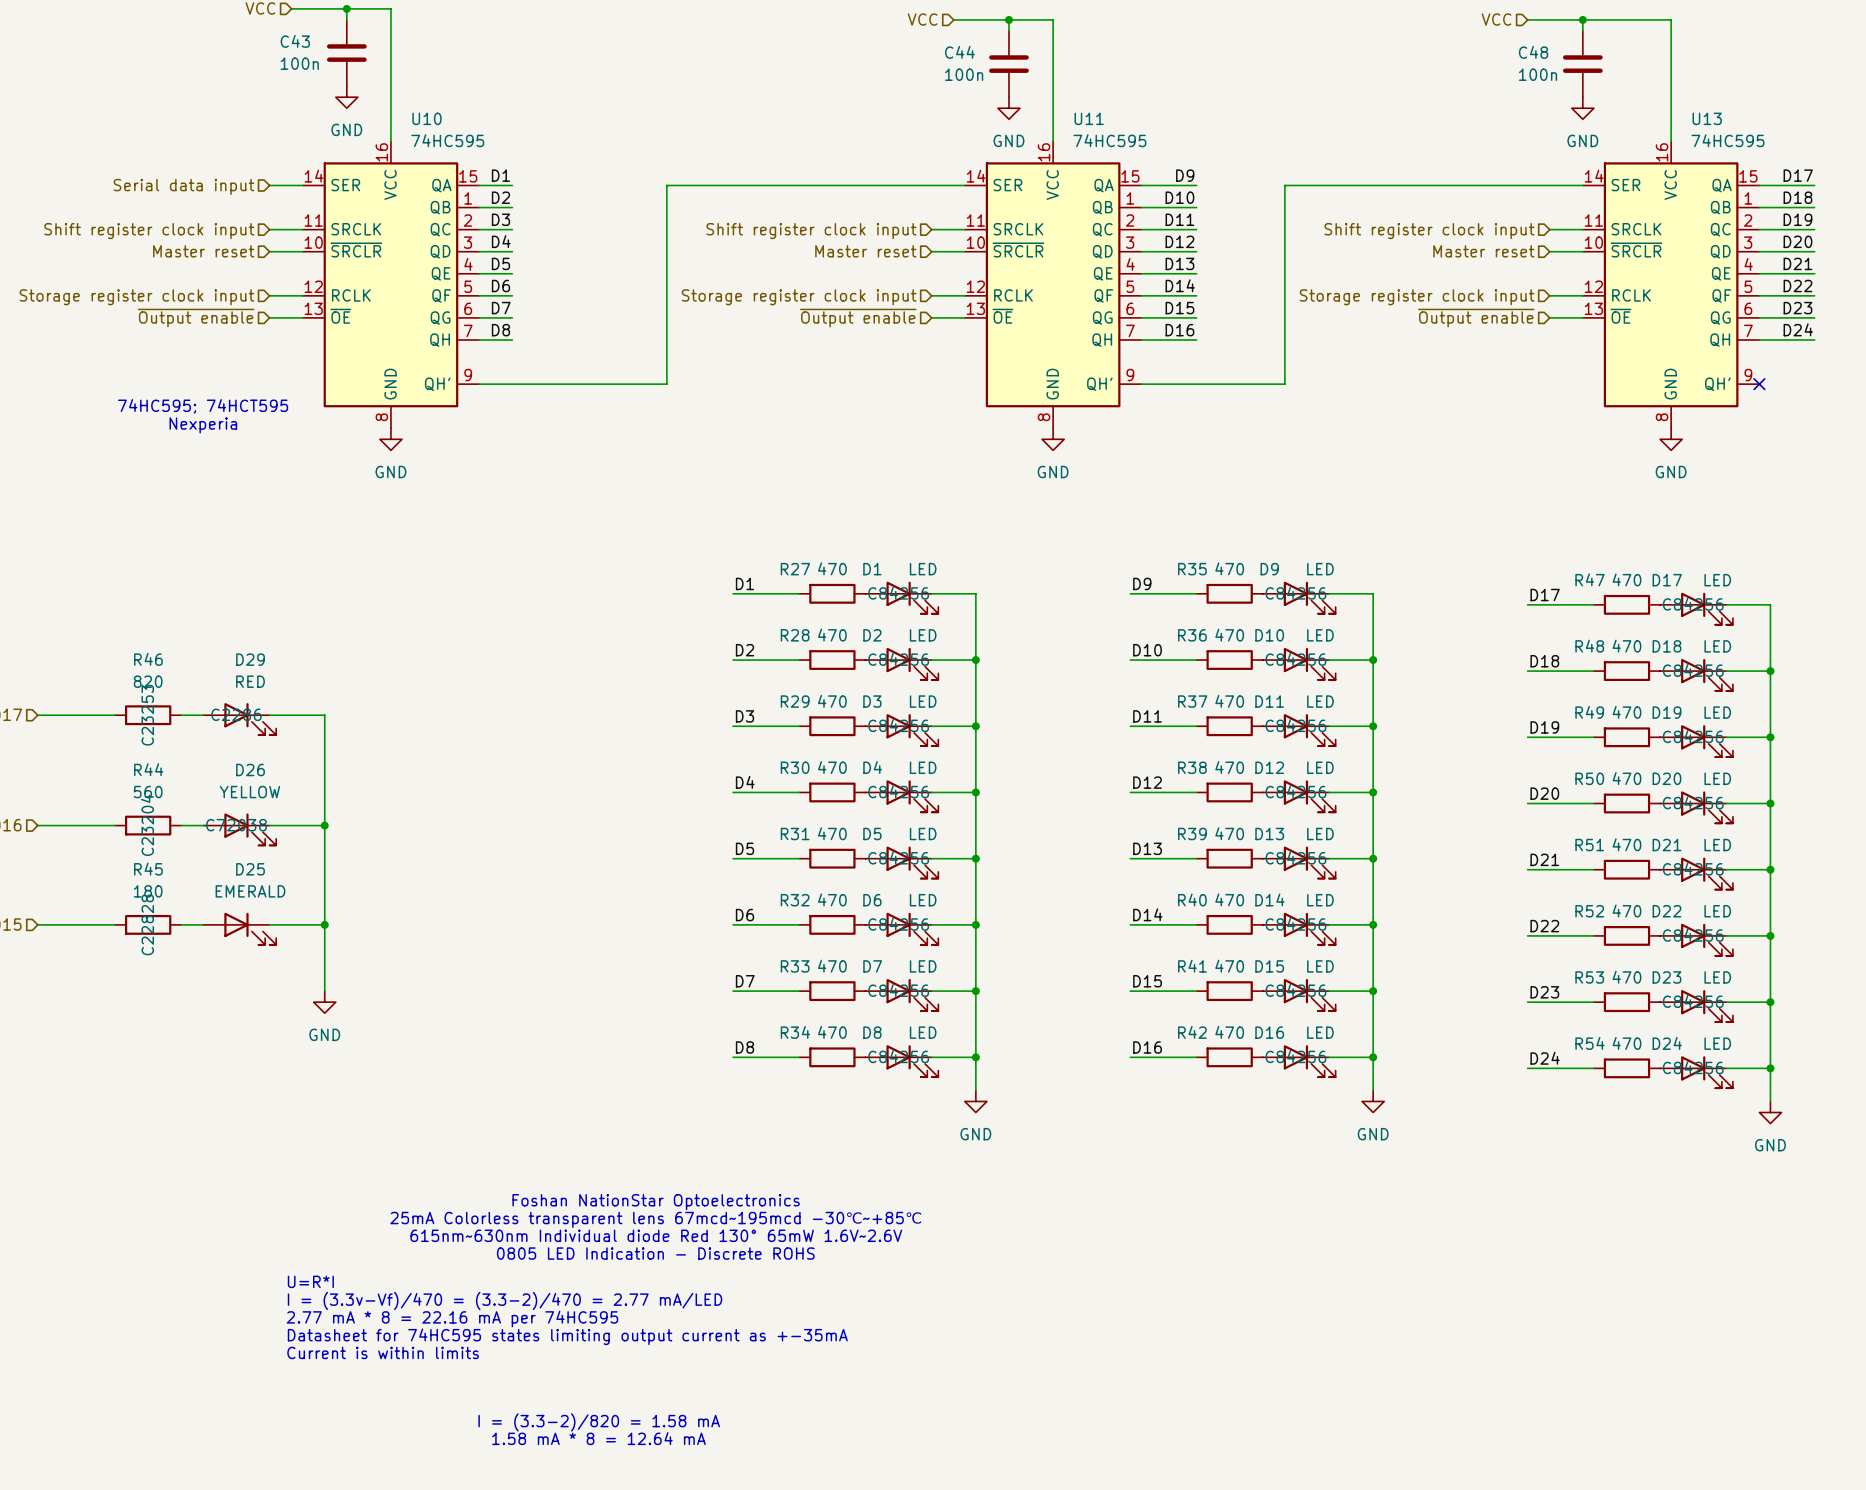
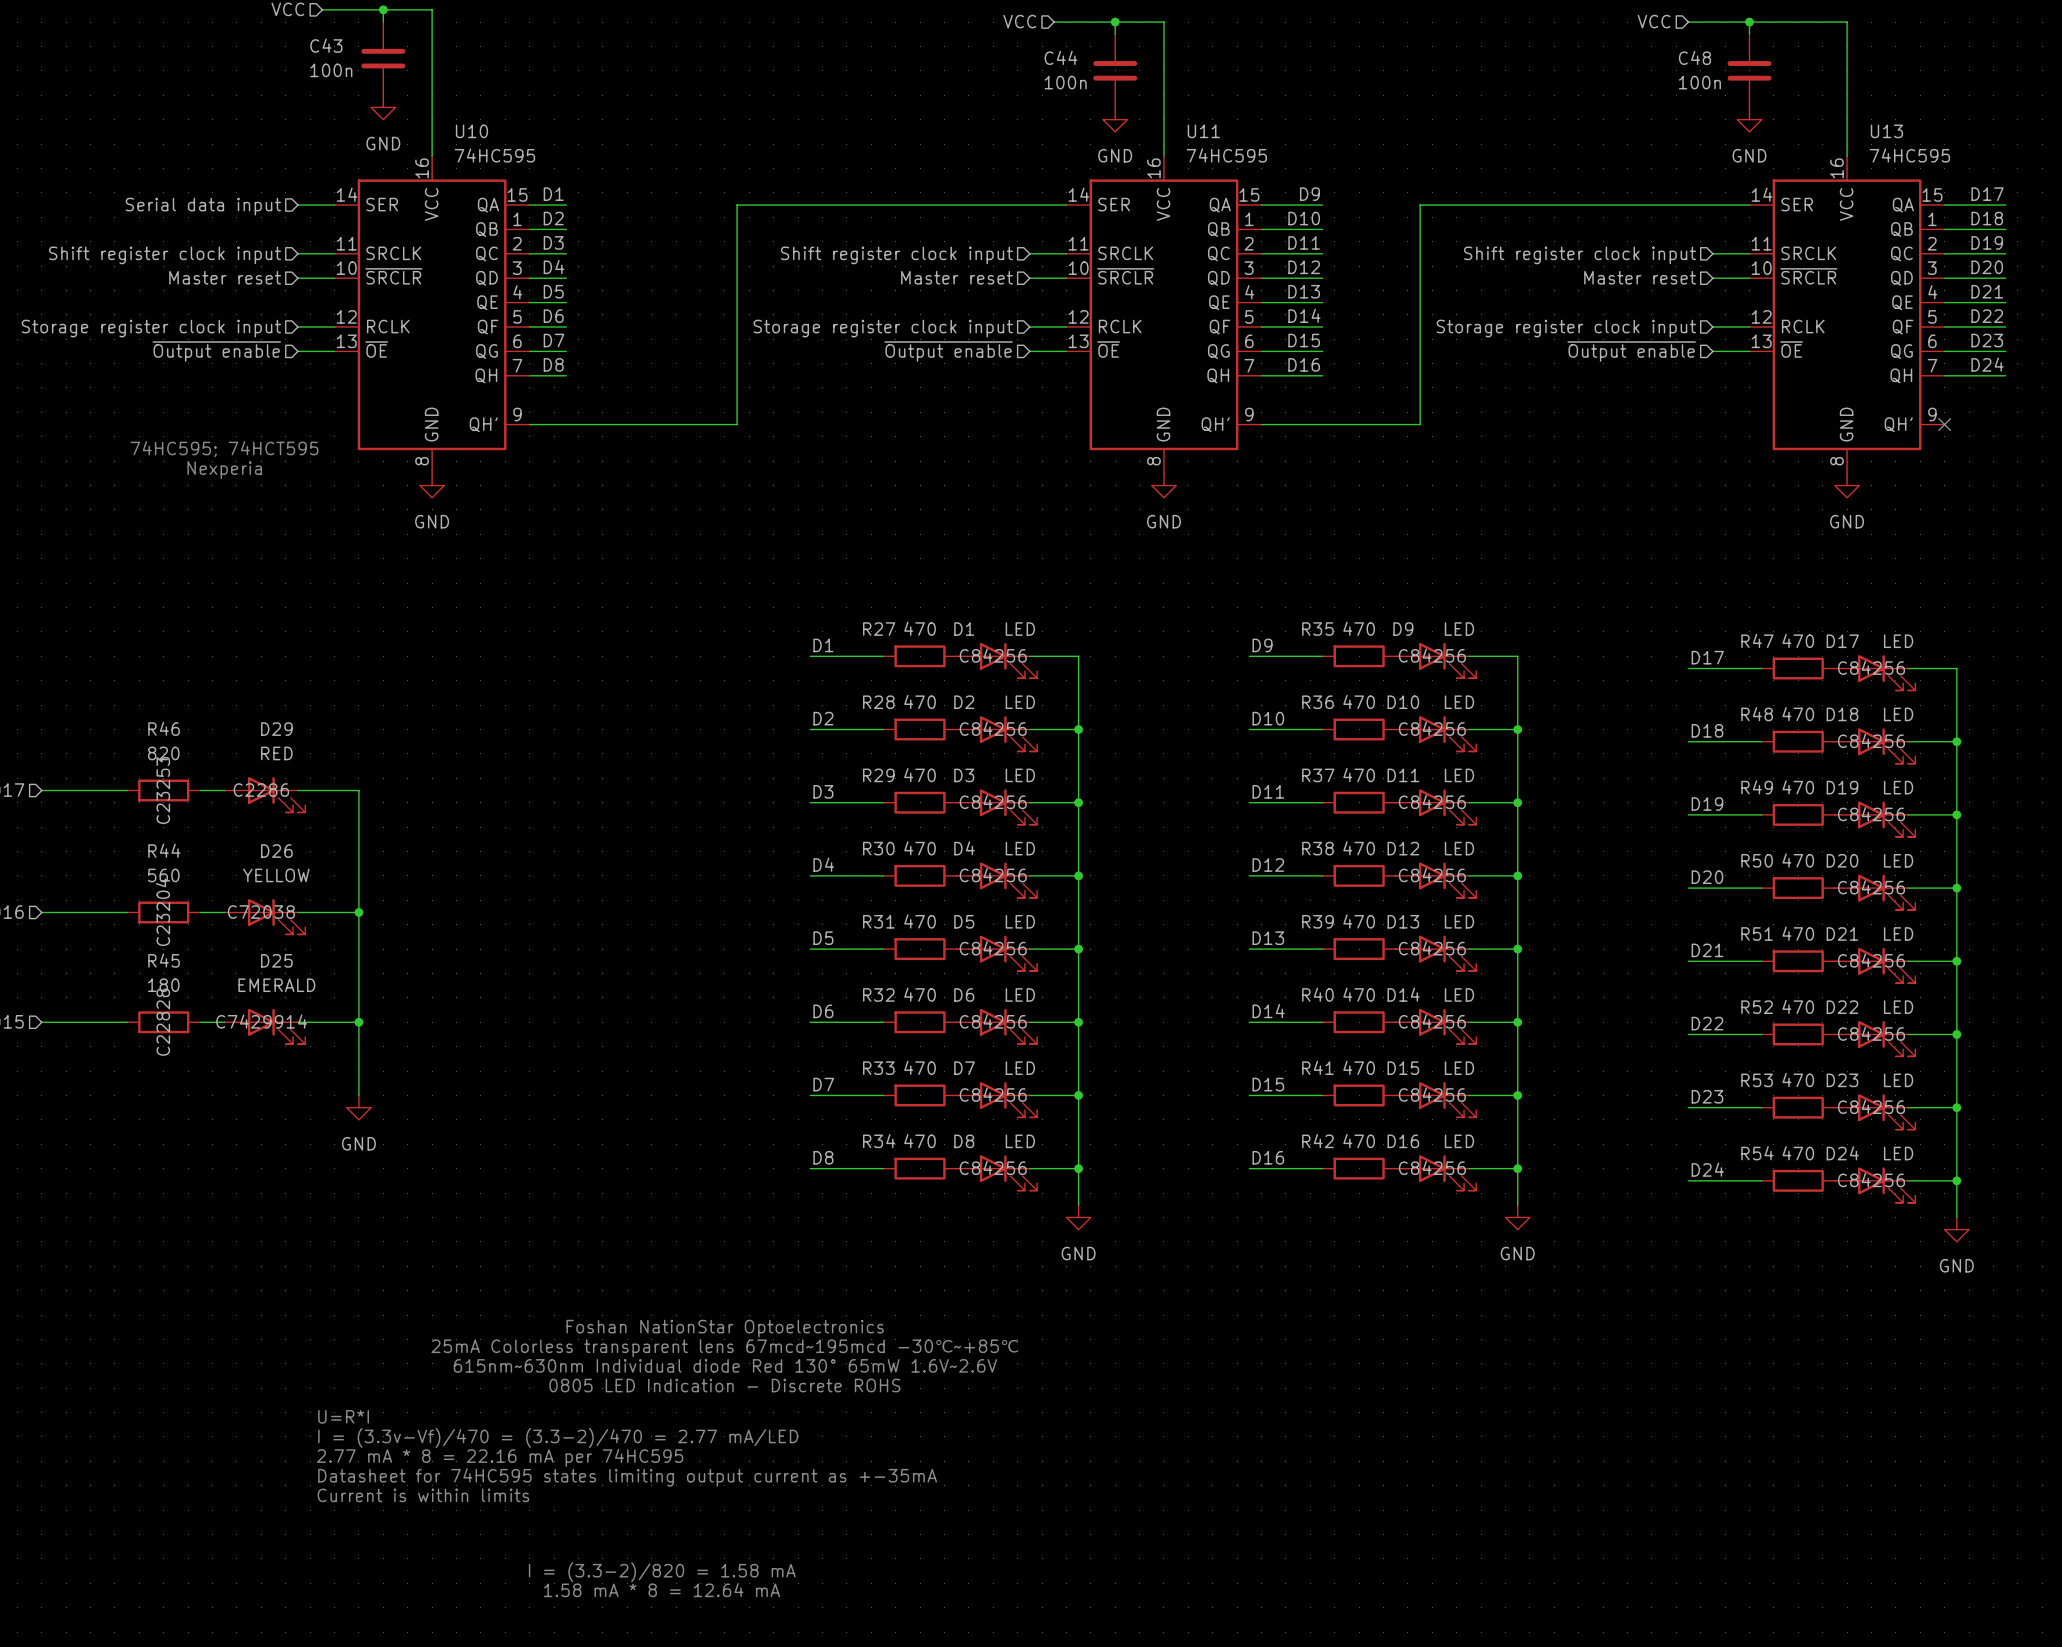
D25 text: none -> C7429914 (261, 1021)

